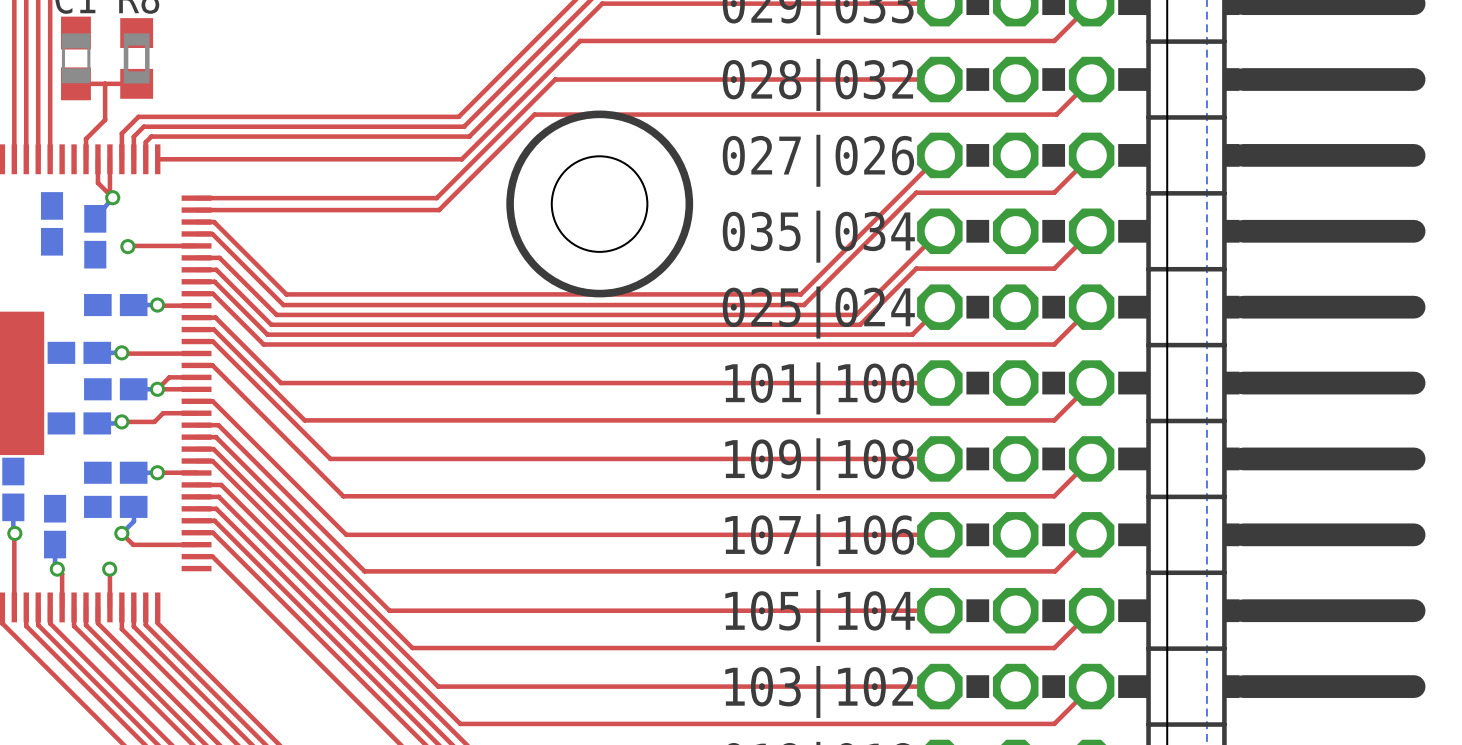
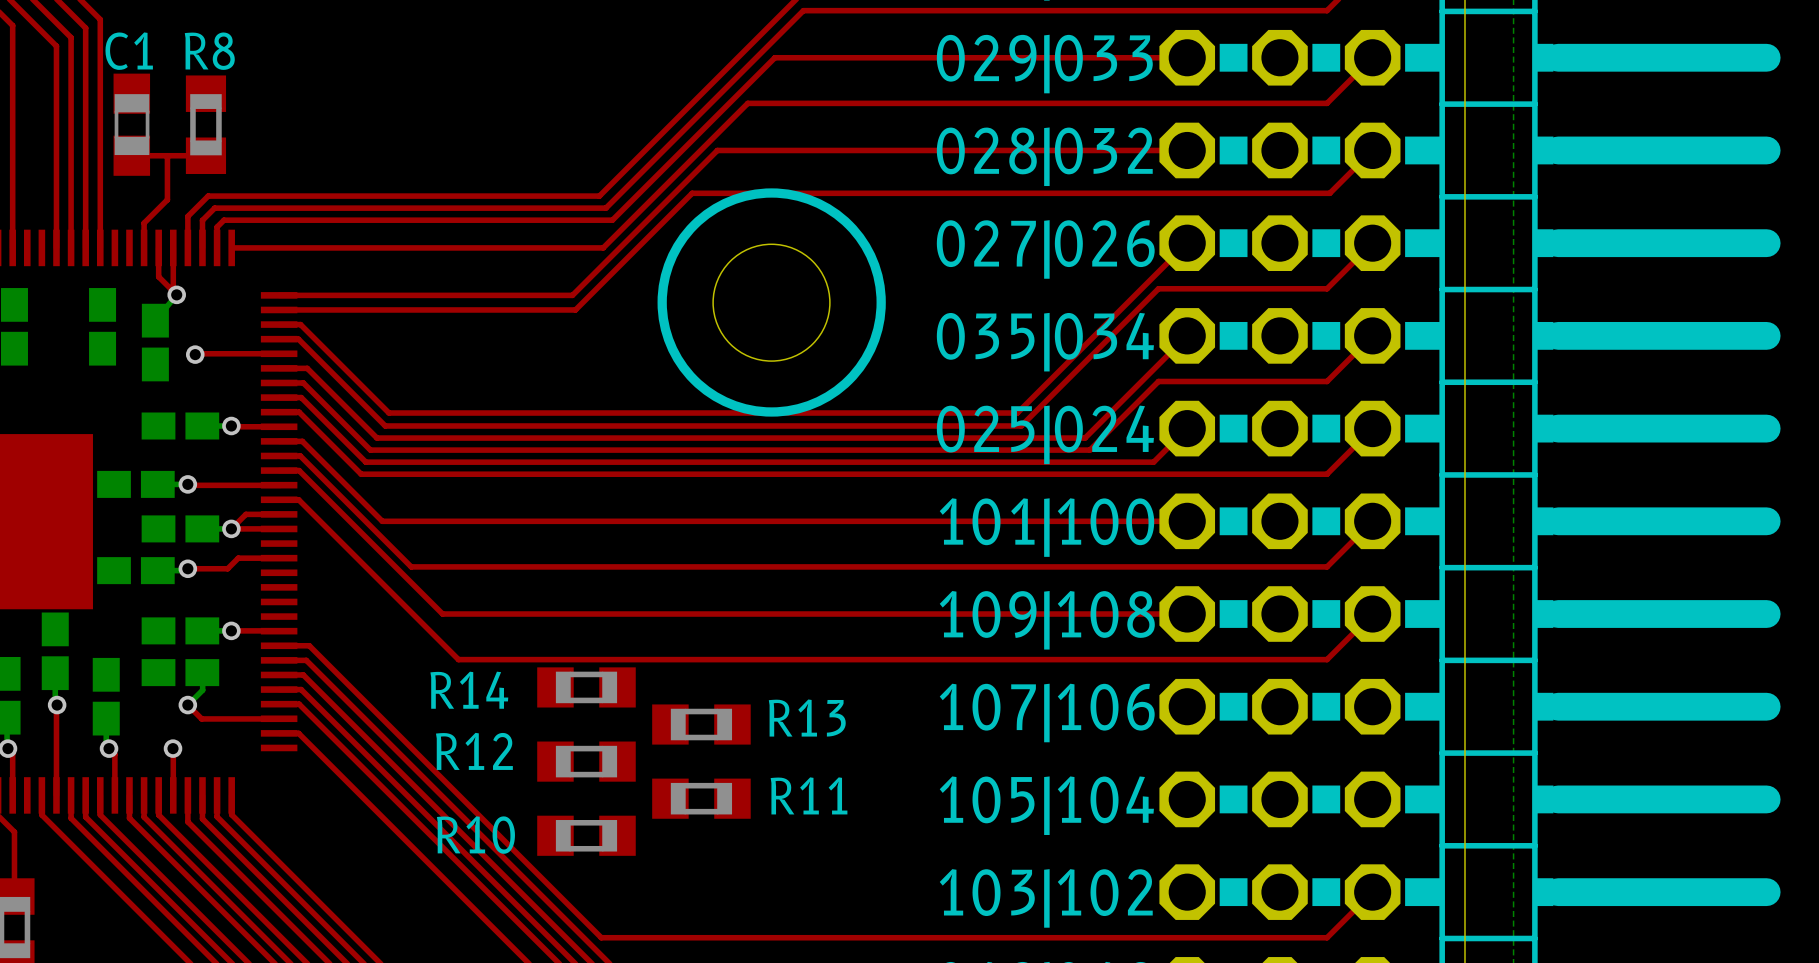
top track: (196, 401) (212, 401) (346, 534) (939, 534) -> none
top track: (196, 425) (218, 425) (364, 571) (1055, 571) (1091, 534) -> none
top track: (196, 437) (215, 437) (389, 610) (939, 610) -> none
top track: (196, 449) (213, 449) (412, 648) (1054, 648) (1091, 610) -> none
top track: (196, 461) (212, 461) (438, 686) (939, 686) -> none
R14: none -> (586, 687)
R13: none -> (701, 724)
R12: none -> (586, 761)
R11: none -> (701, 798)
R10: none -> (586, 835)

